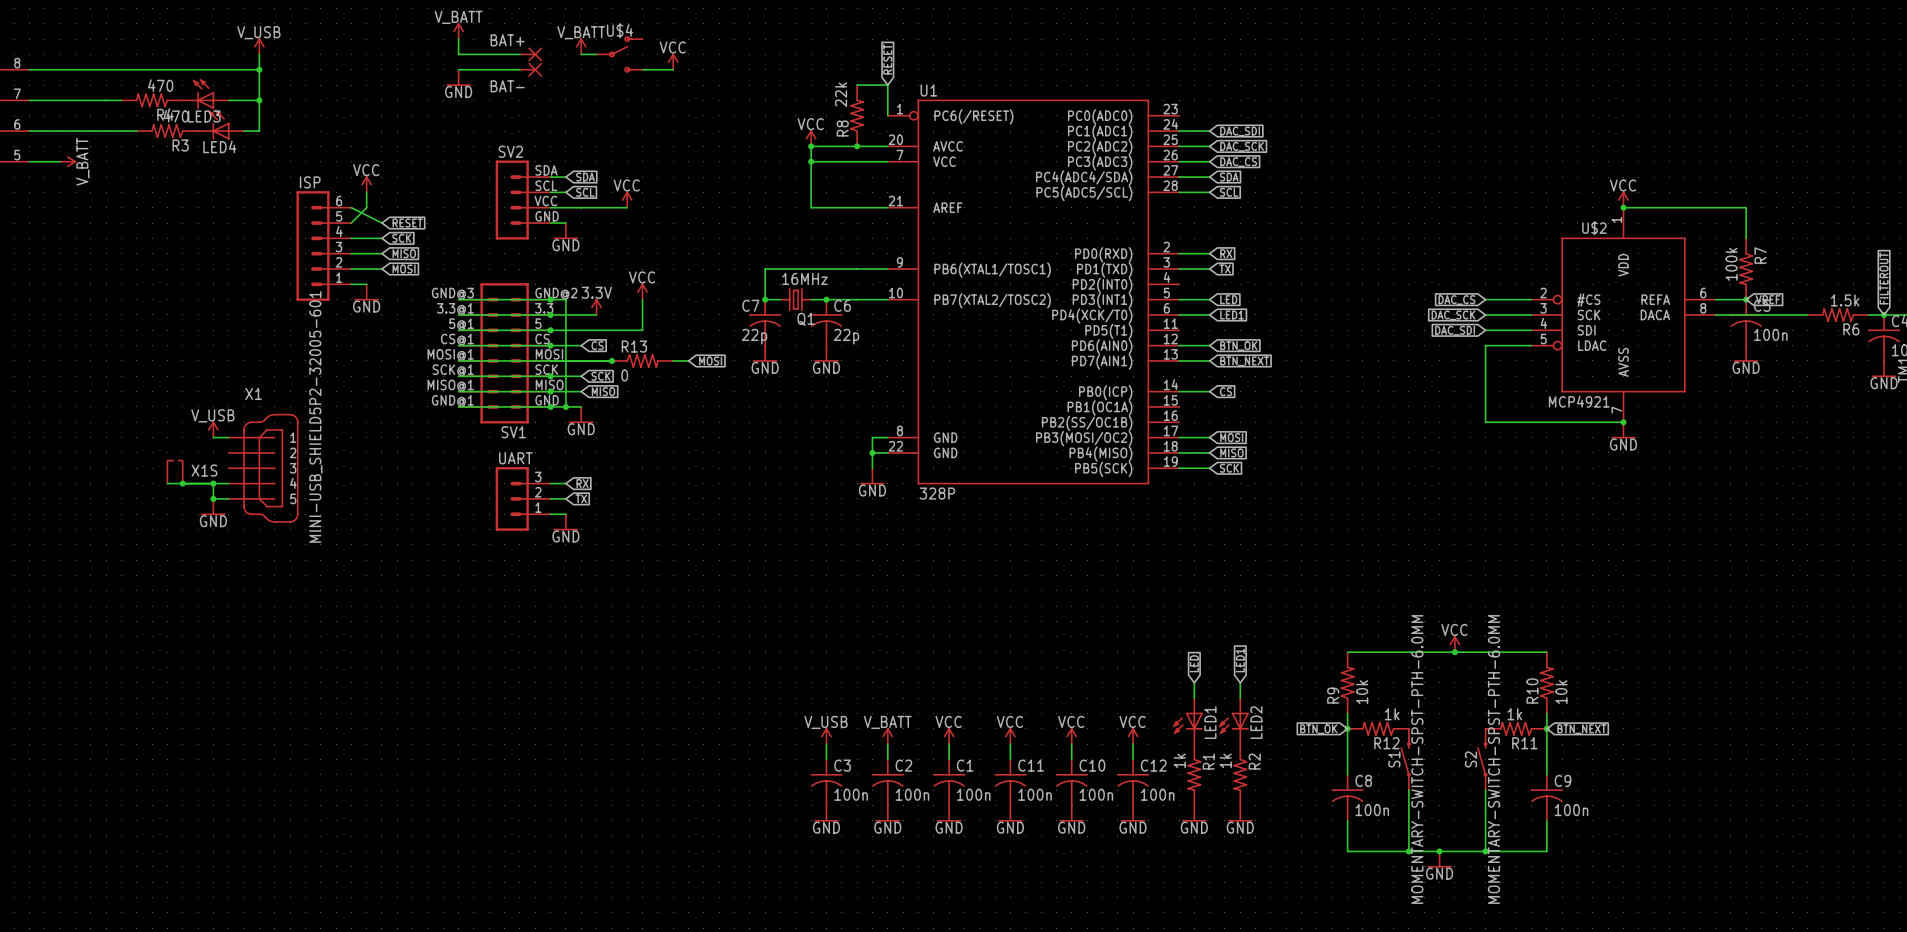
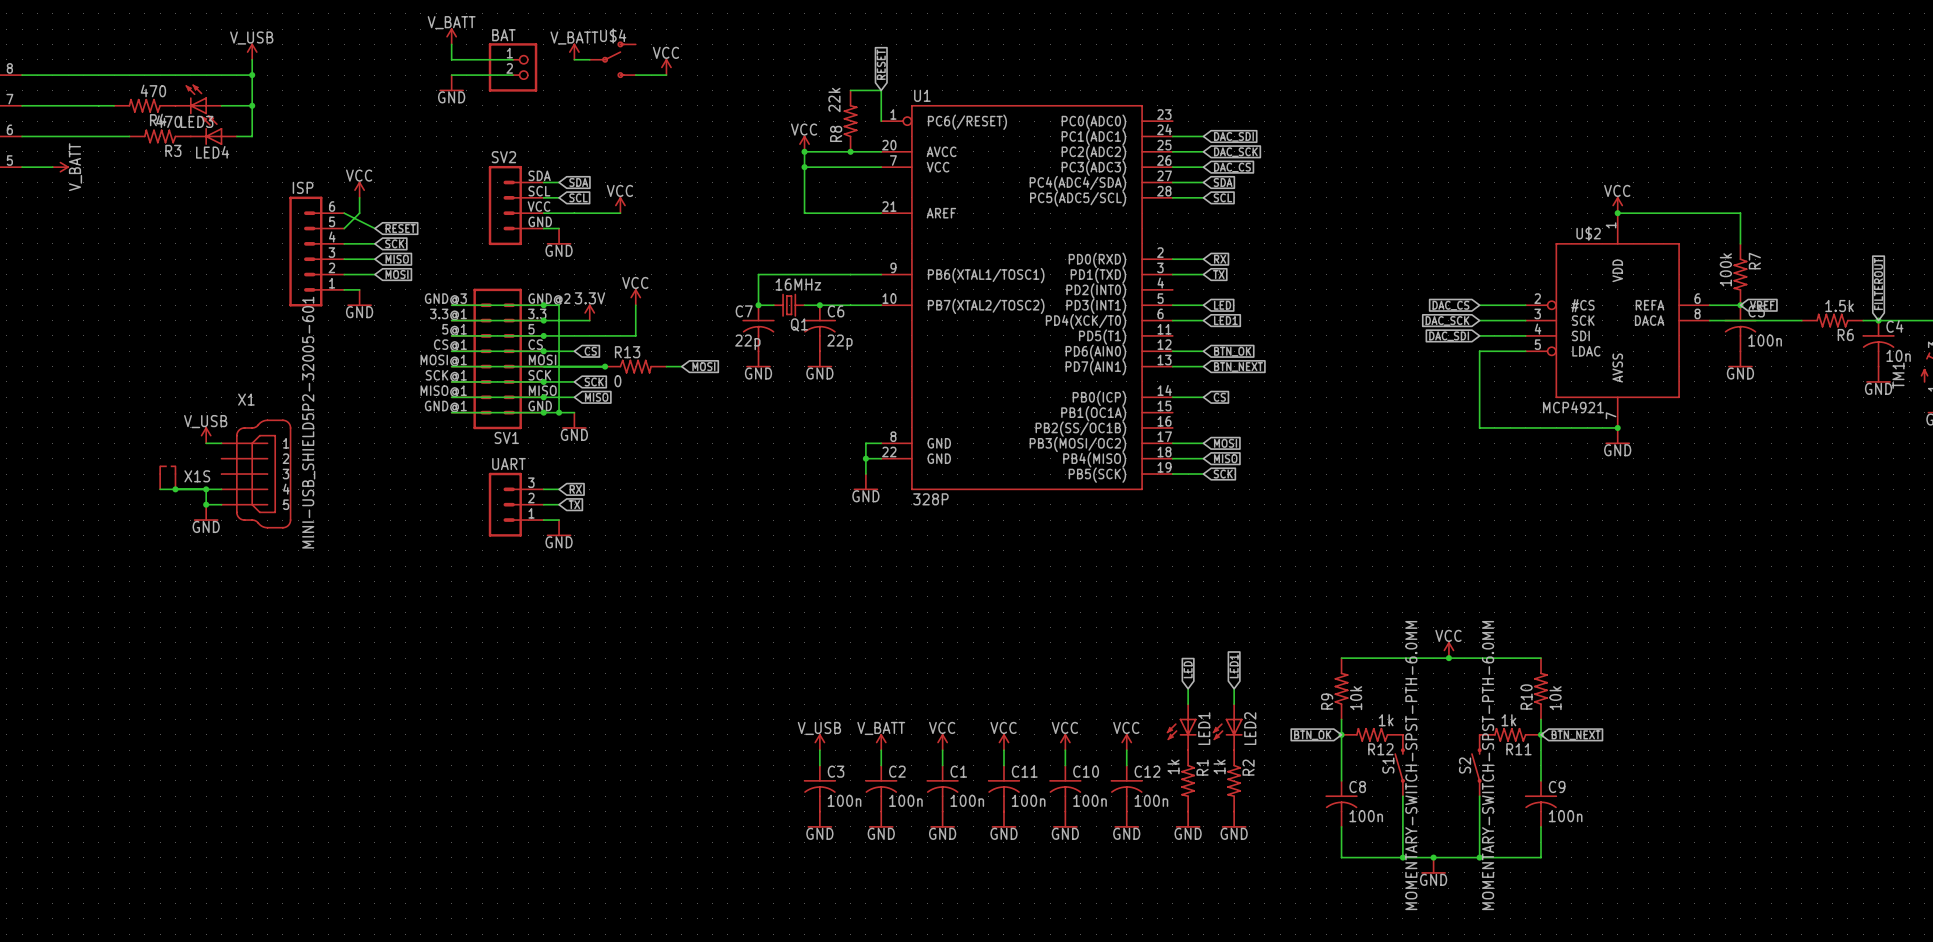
BAT+: (531, 54) -> none
BAT: none -> (513, 67)
BAT-: (531, 69) -> none

